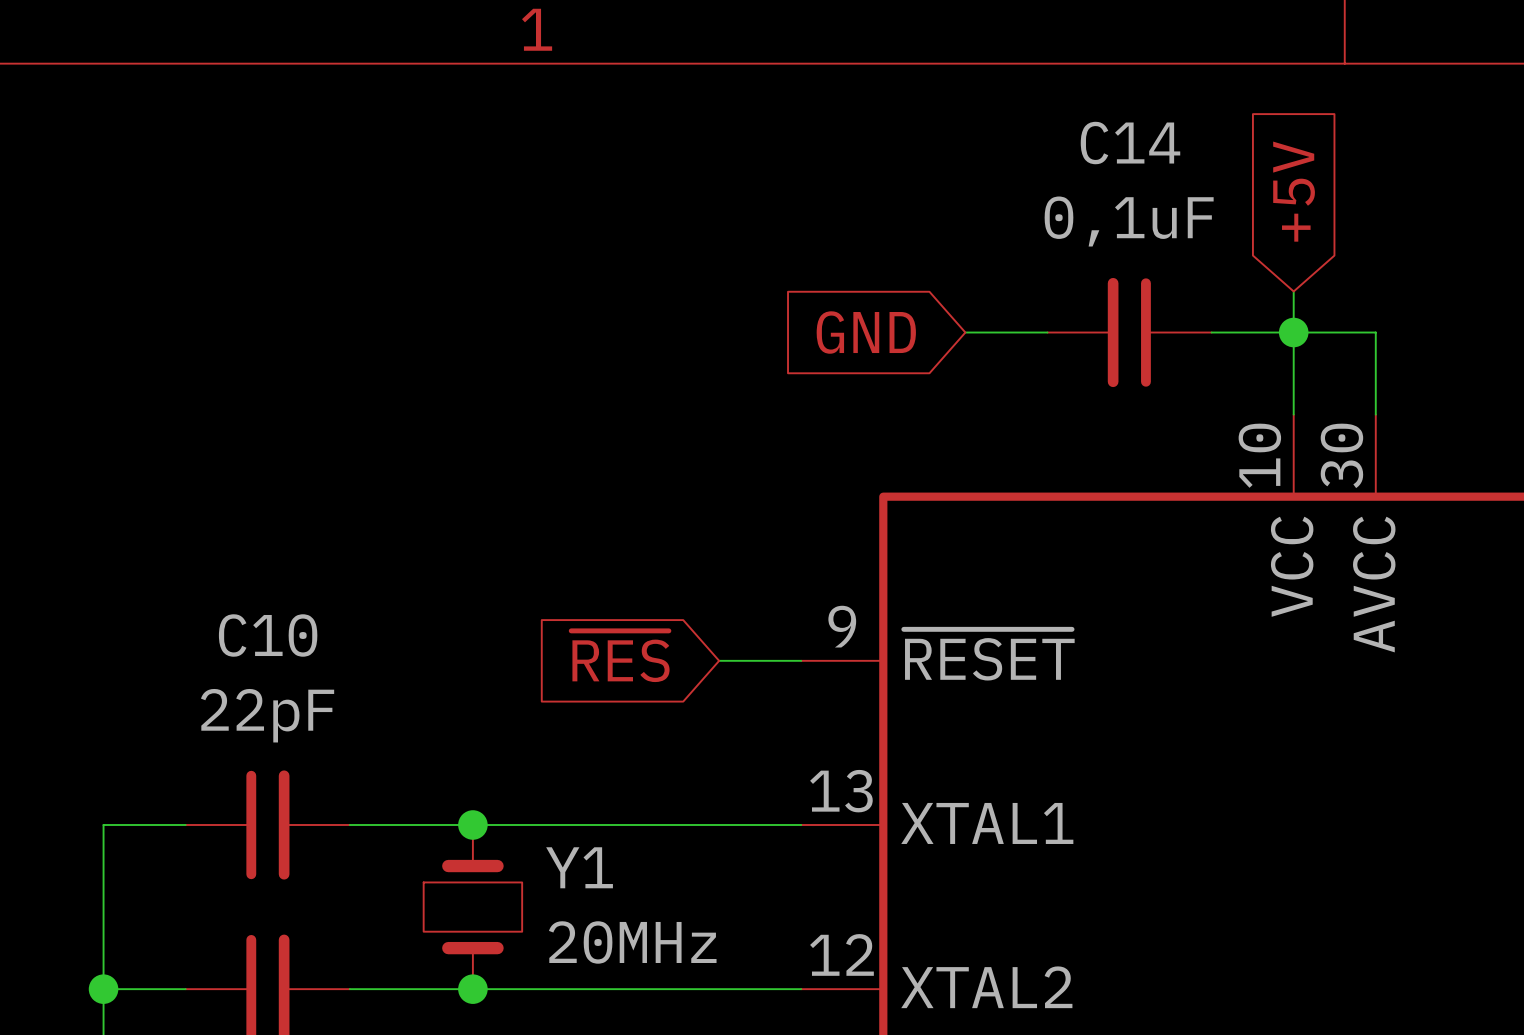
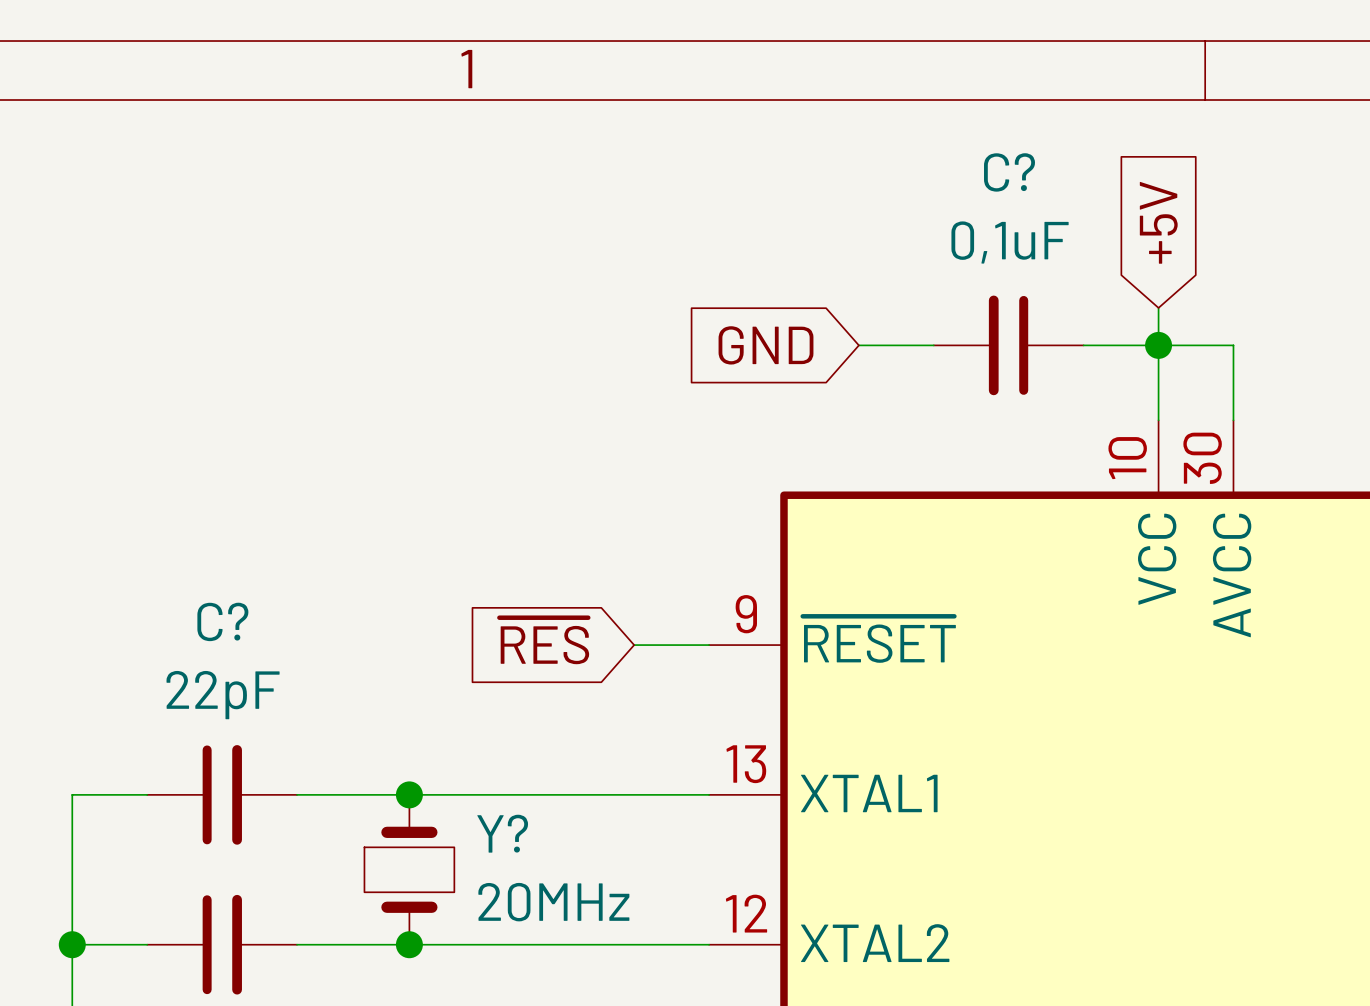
C14 name: C14 (1130, 143) -> C? (1009, 172)
C10 name: C10 (268, 635) -> C? (222, 621)
Y1 name: Y1 (579, 867) -> Y? (502, 833)

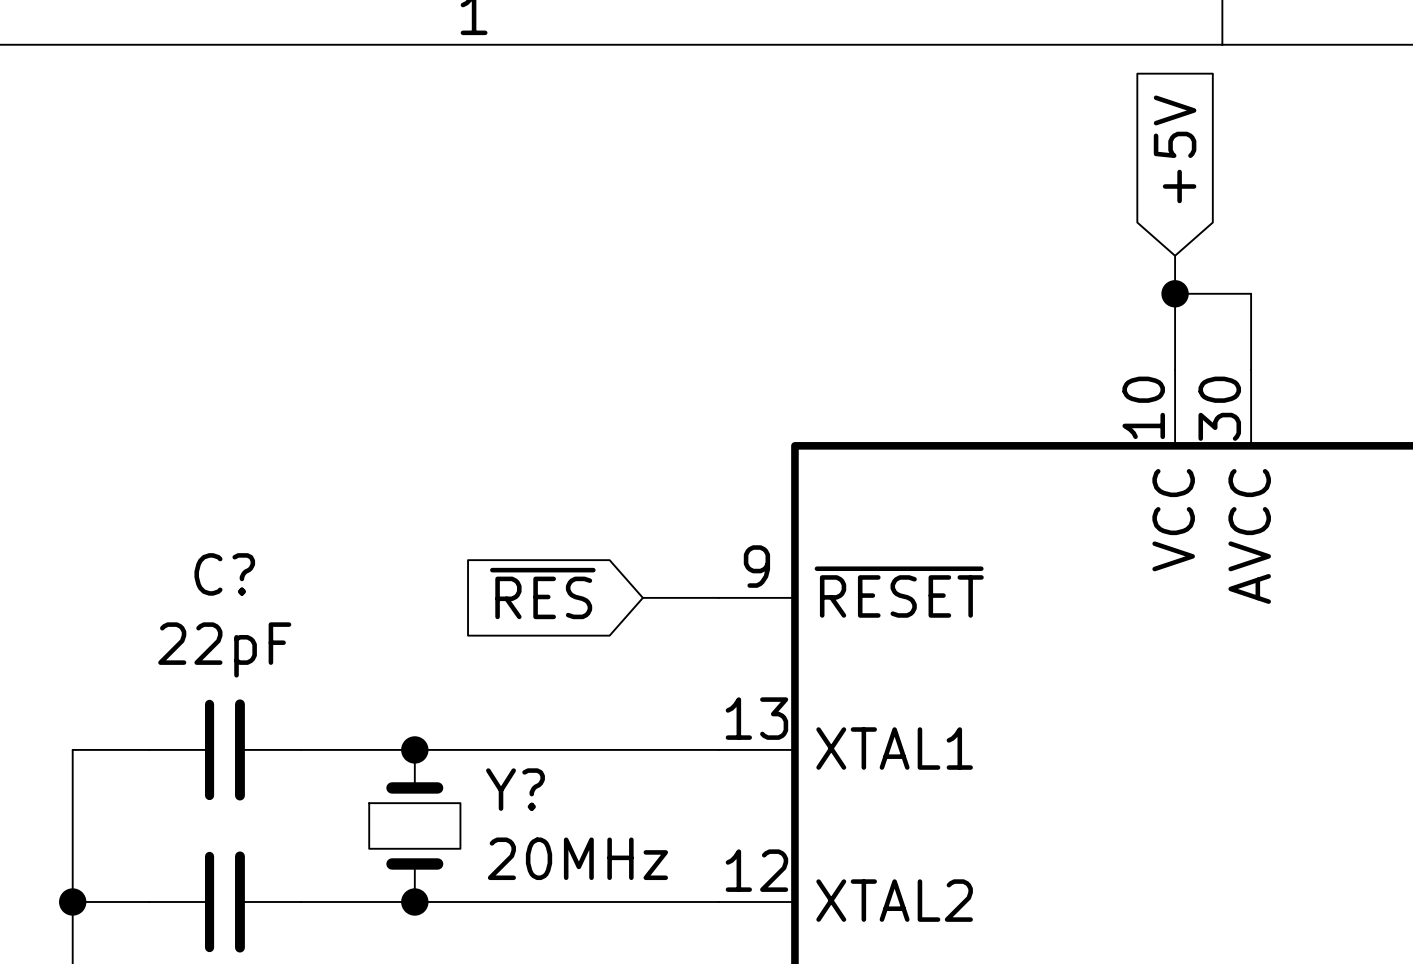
global label: GND (766, 345) -> none
wire: (858, 345) (933, 345) -> none
C?: 0,1uF (1008, 345) -> none
wire: (1083, 345) (1158, 345) -> none

